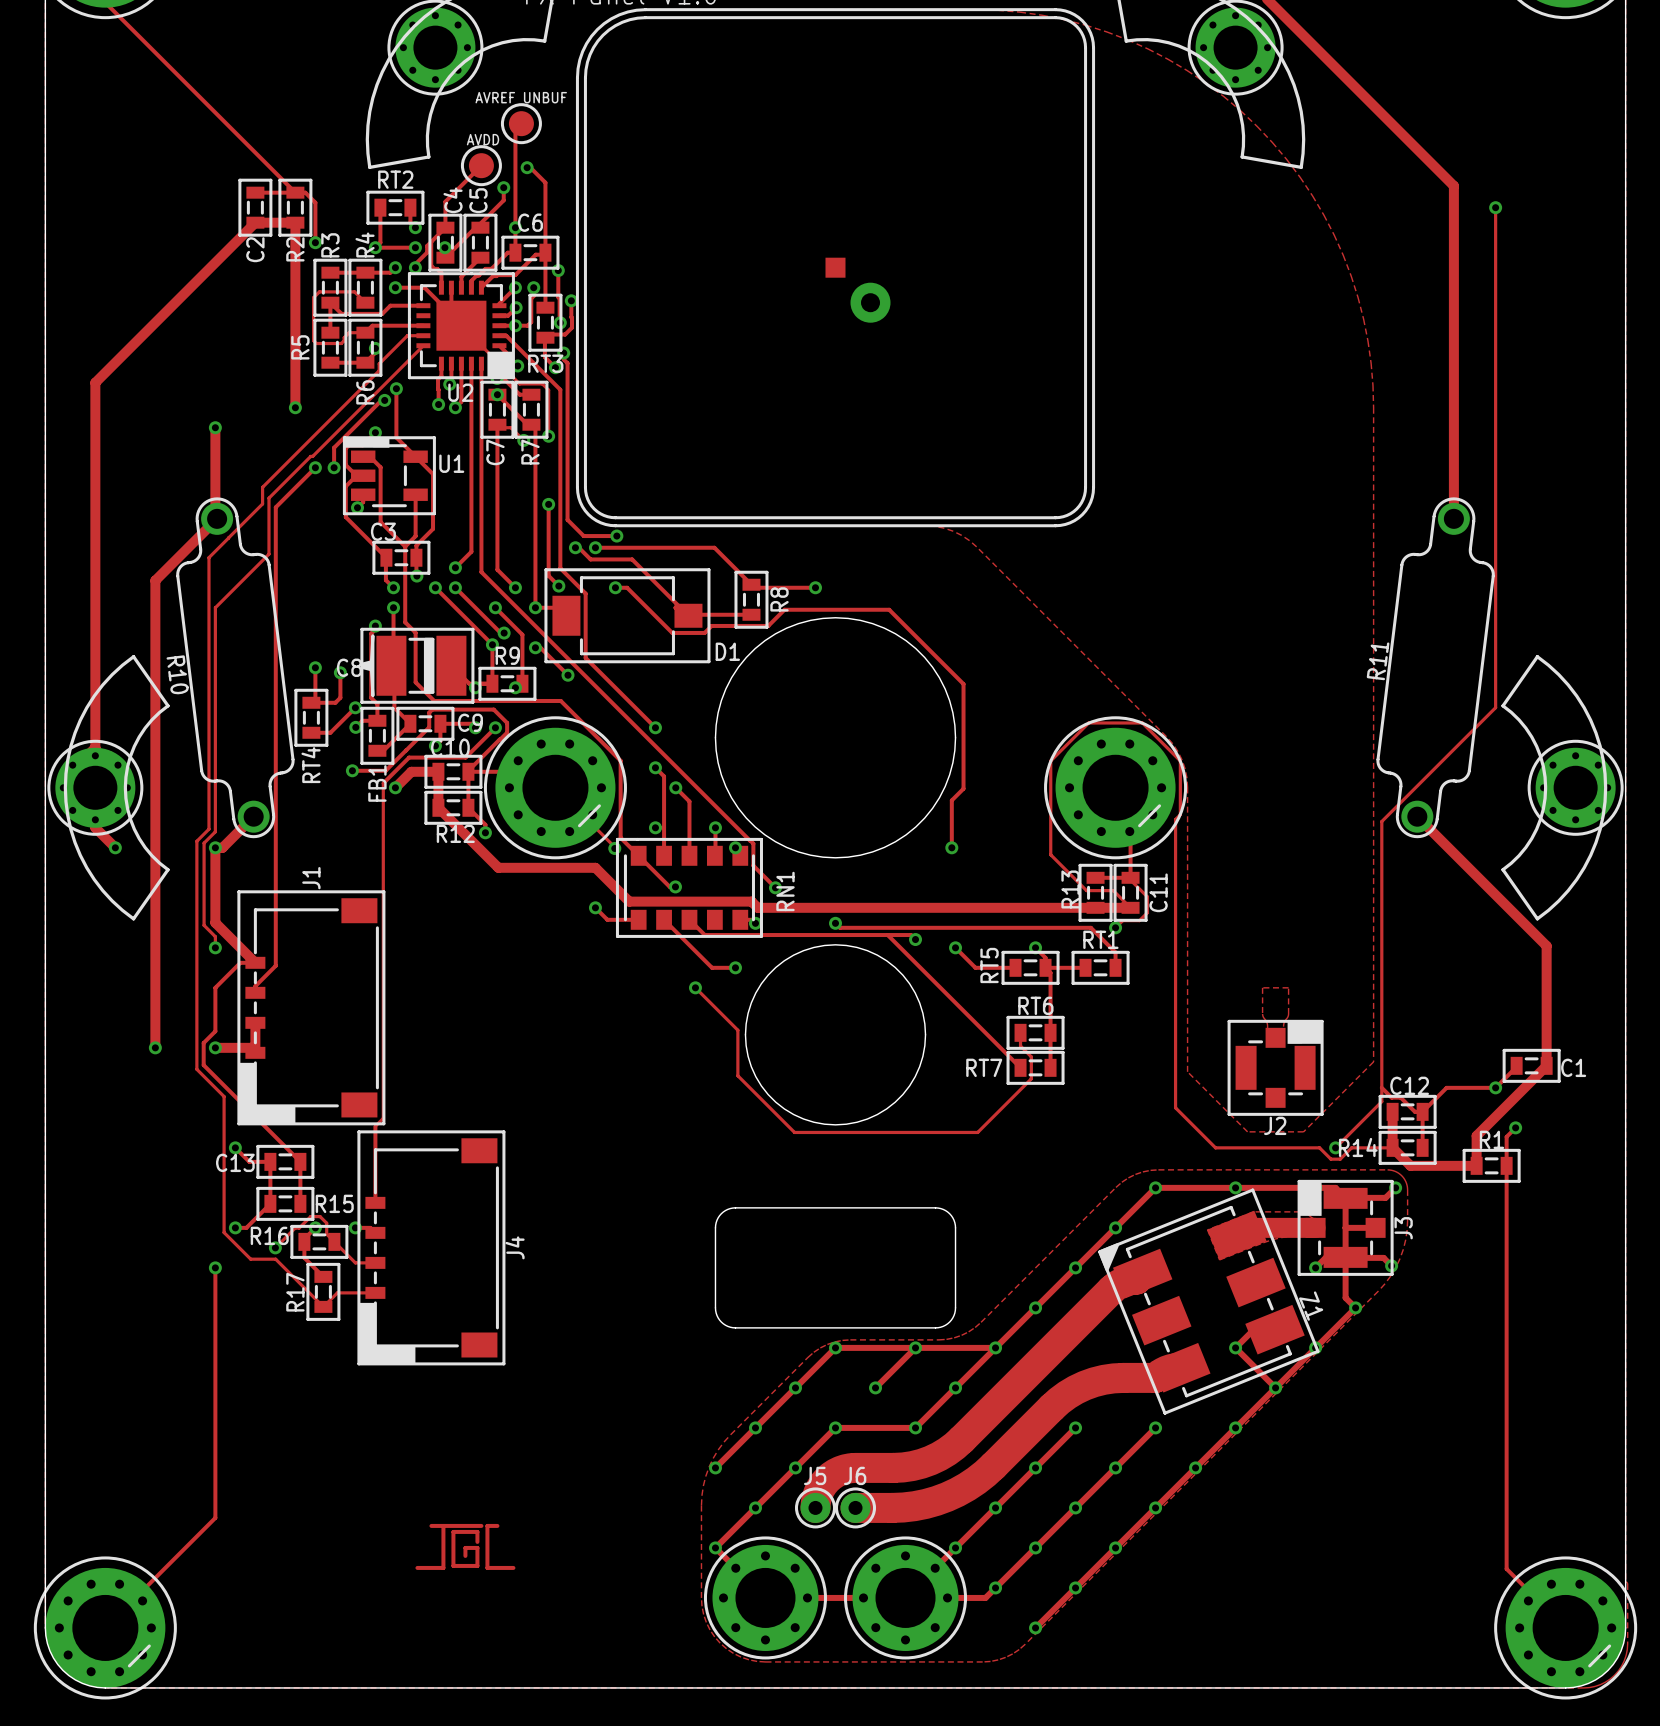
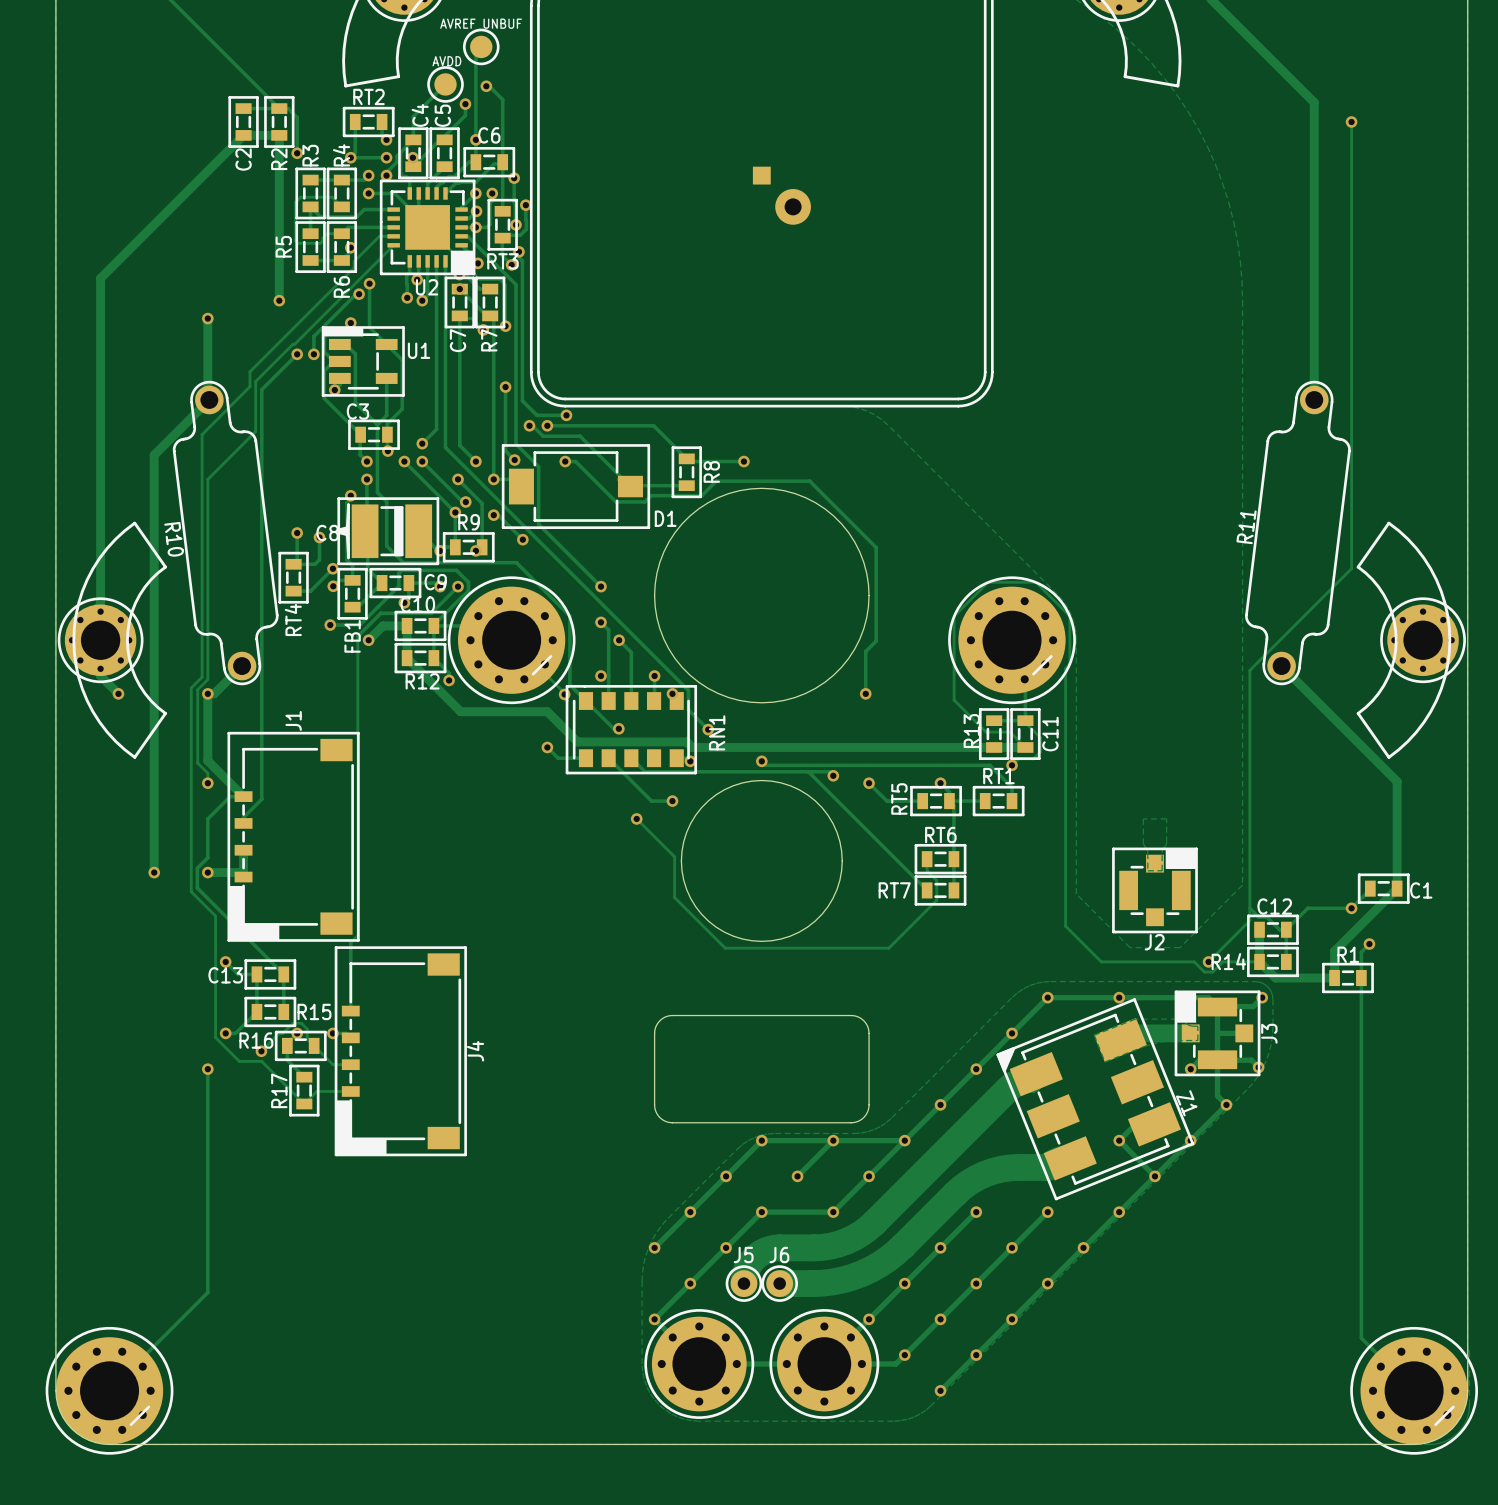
drawing: [415, 1523, 516, 1570] -> none

